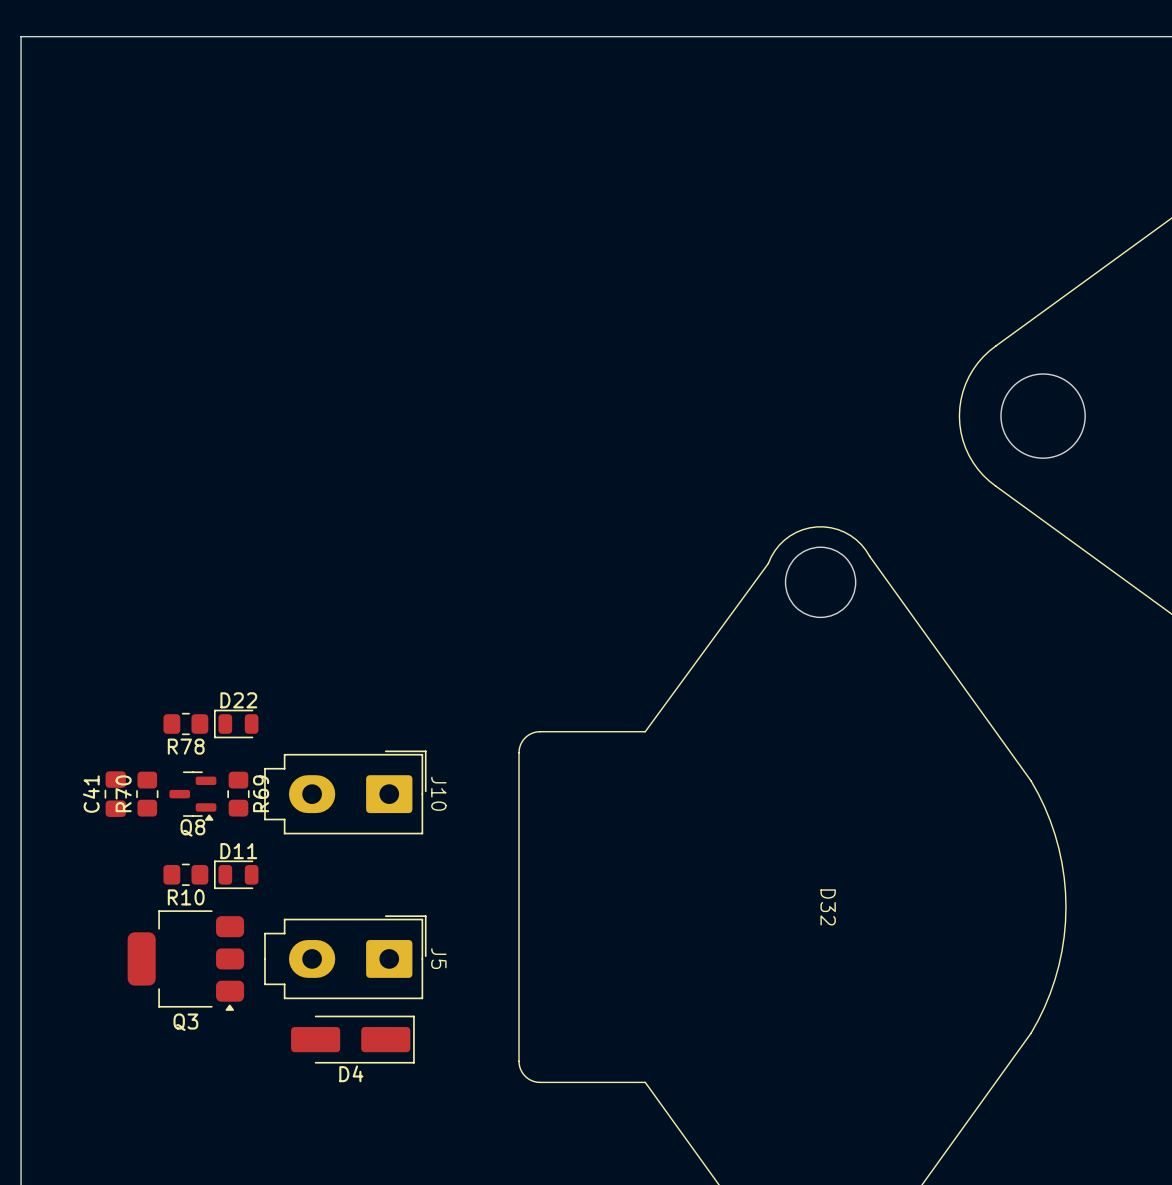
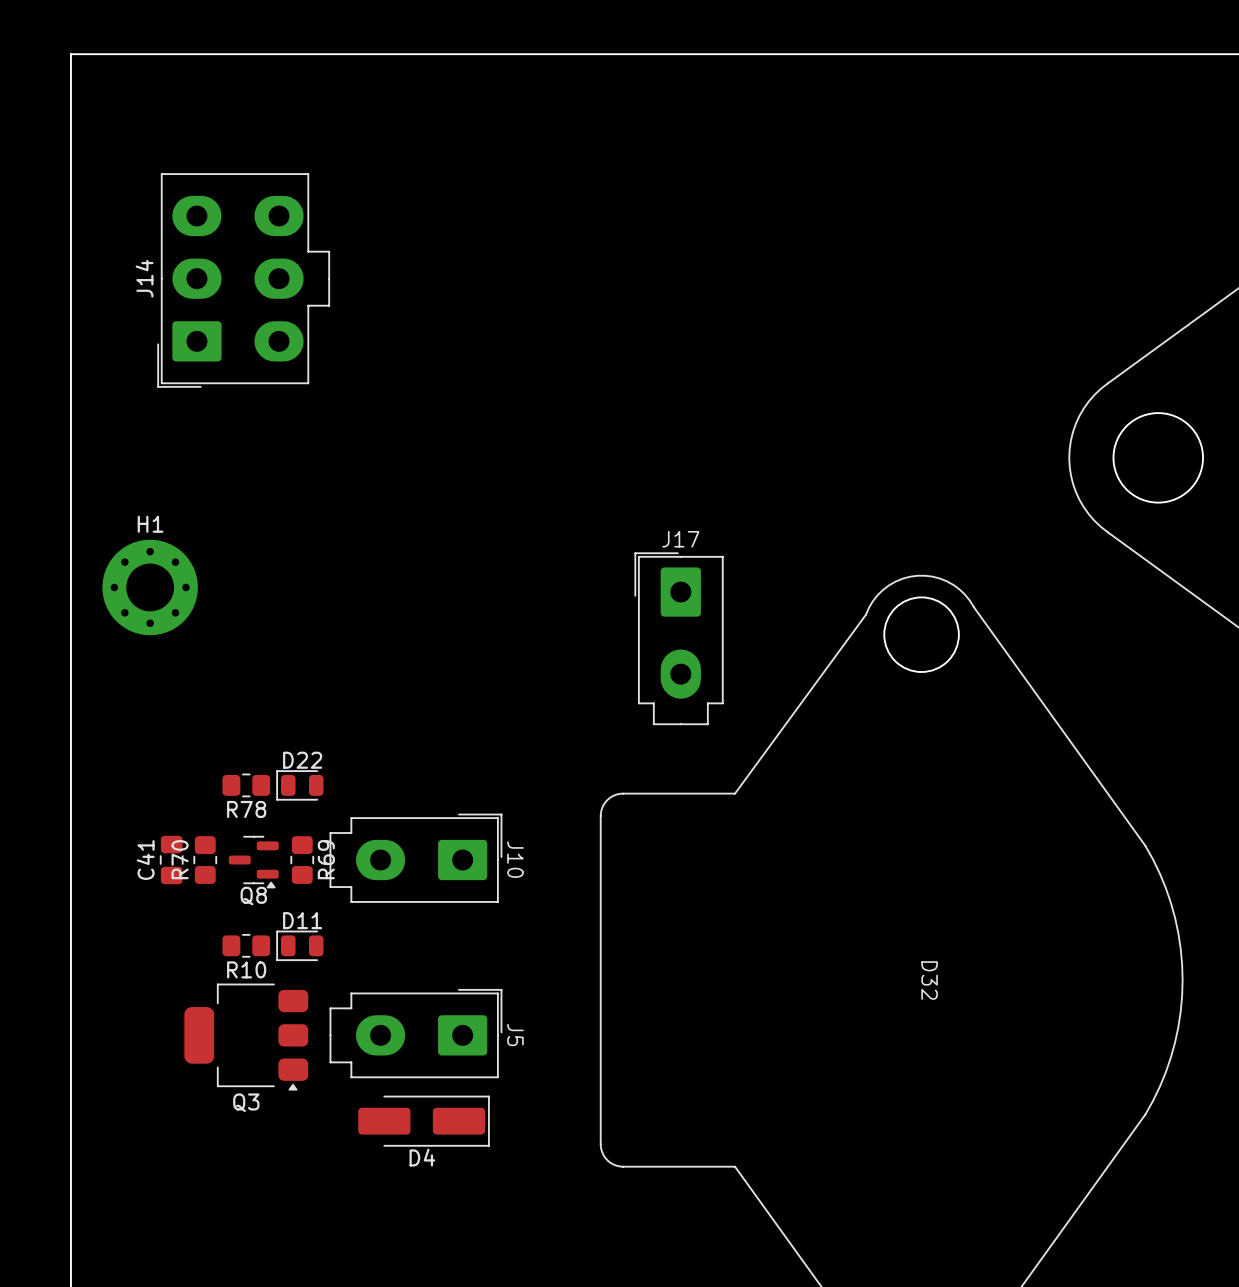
J14: none -> (243, 280)
H1: none -> (150, 587)
J17: none -> (679, 638)

